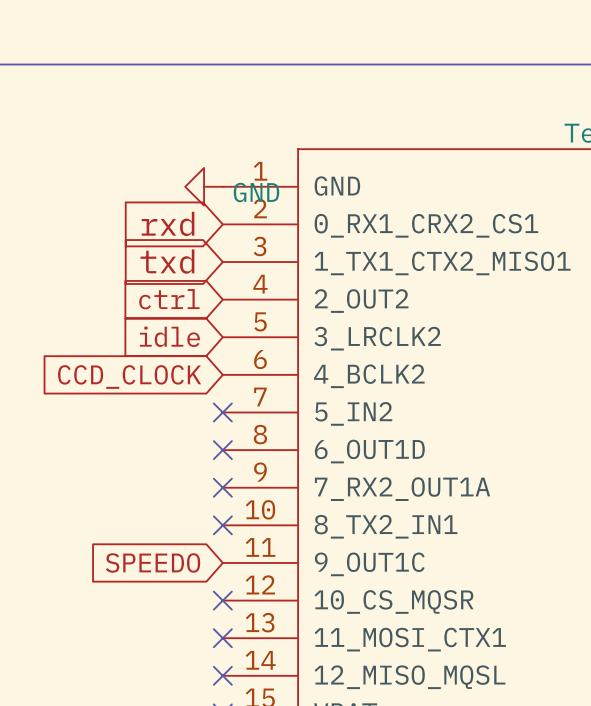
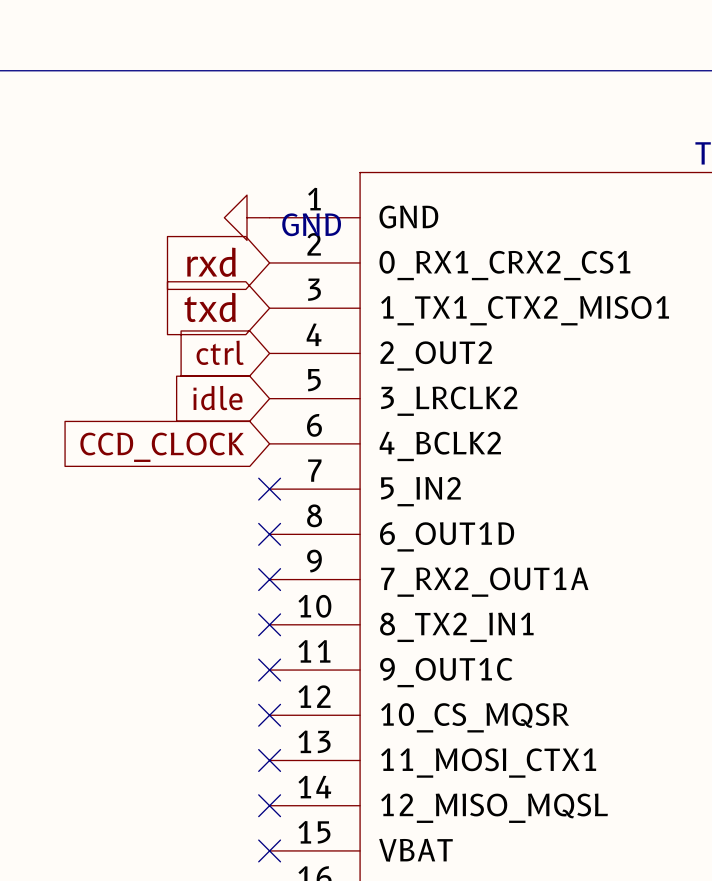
global label: SPEEDO (153, 562) -> none
no-connect mark: none -> (269, 670)

